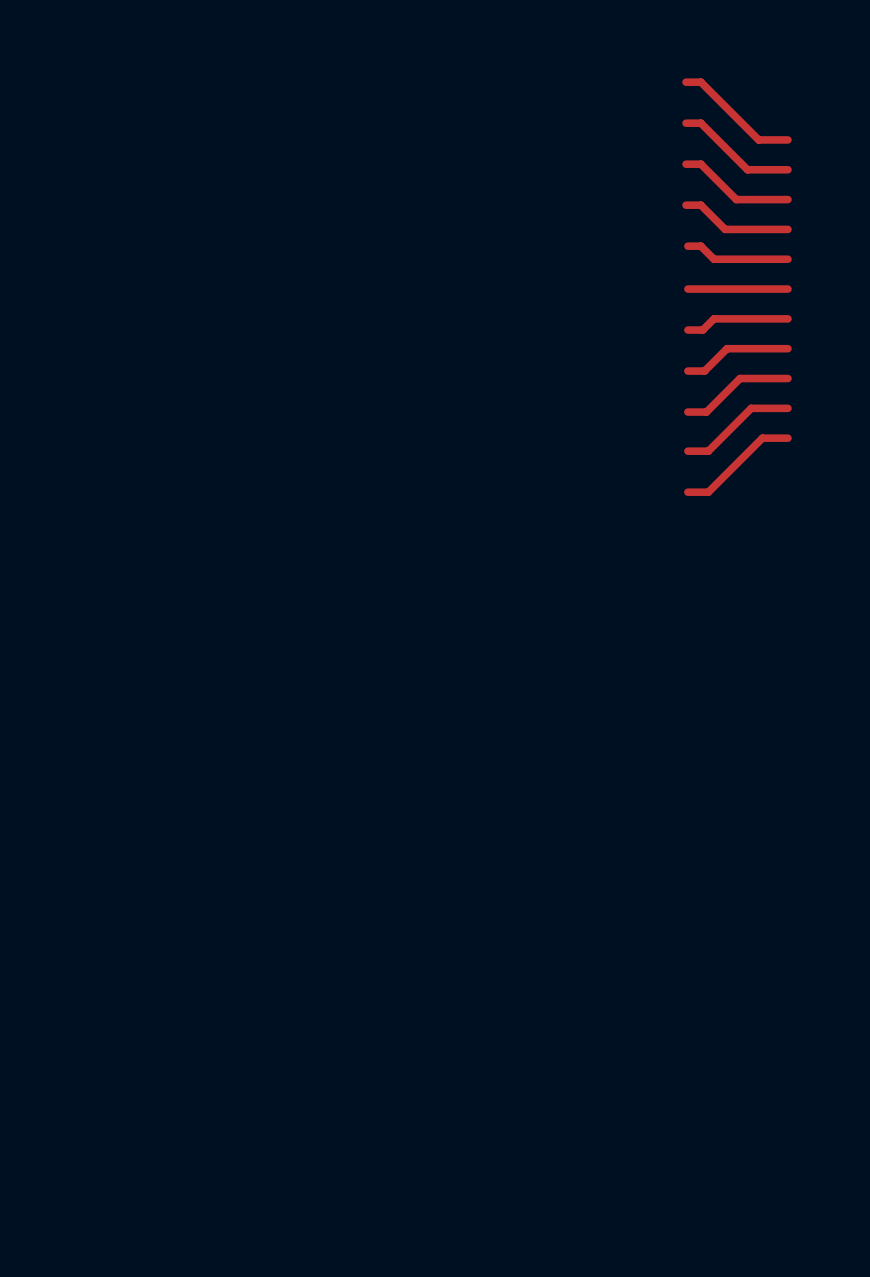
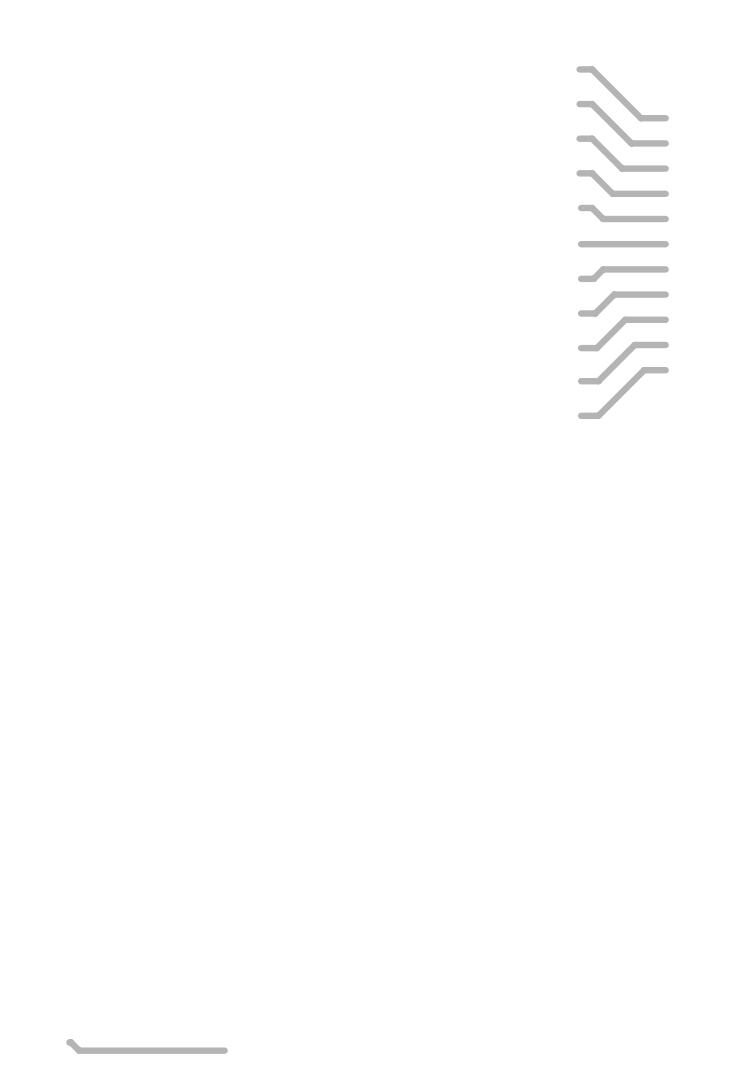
track: none -> (69, 1042) (79, 1050) (224, 1050)

